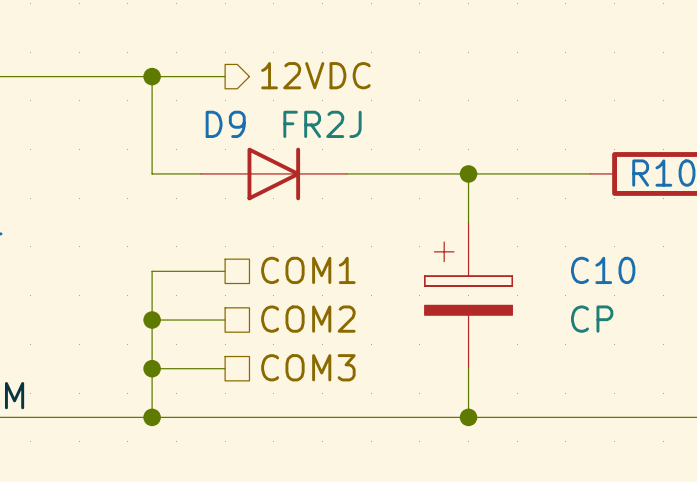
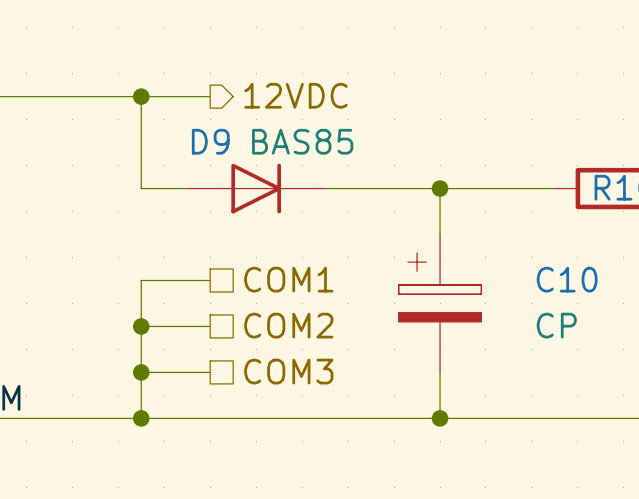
D9 value: FR2J (322, 124) -> BAS85 (302, 141)

